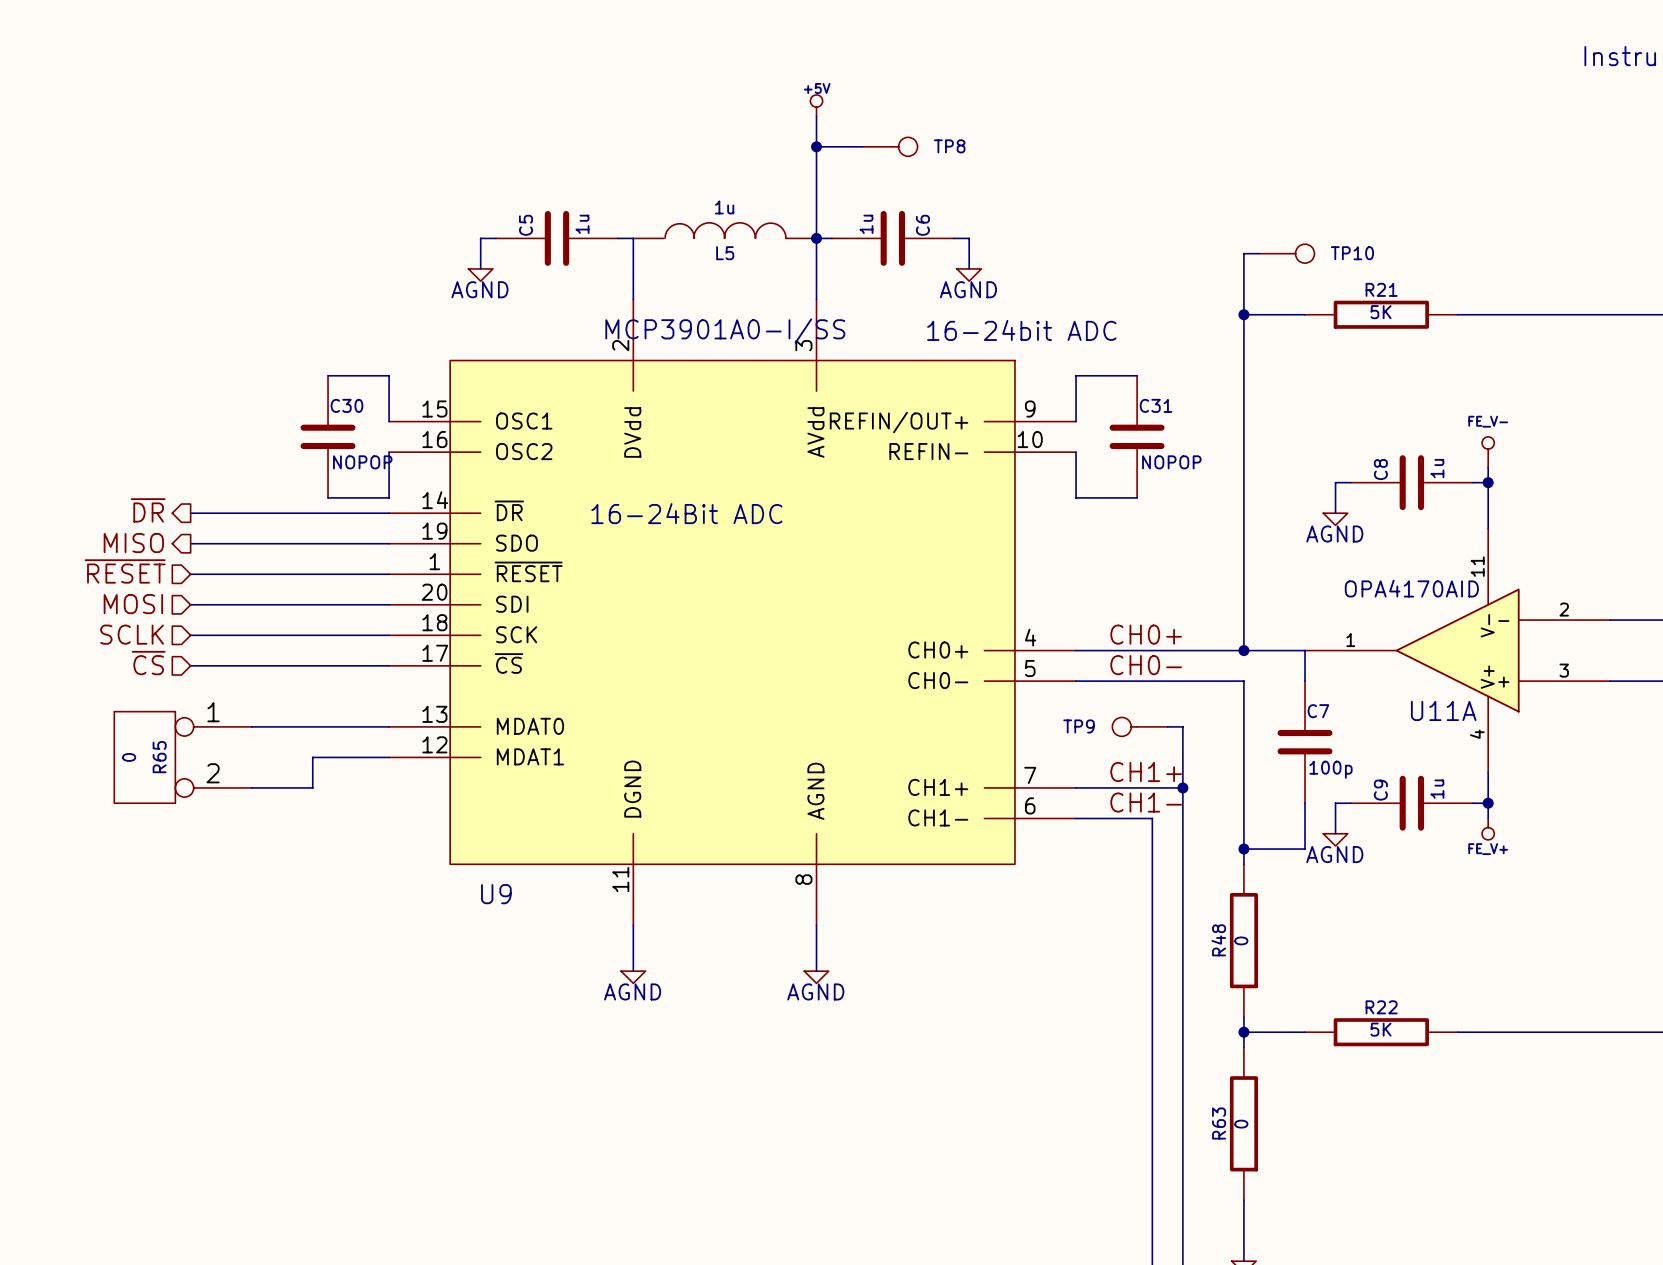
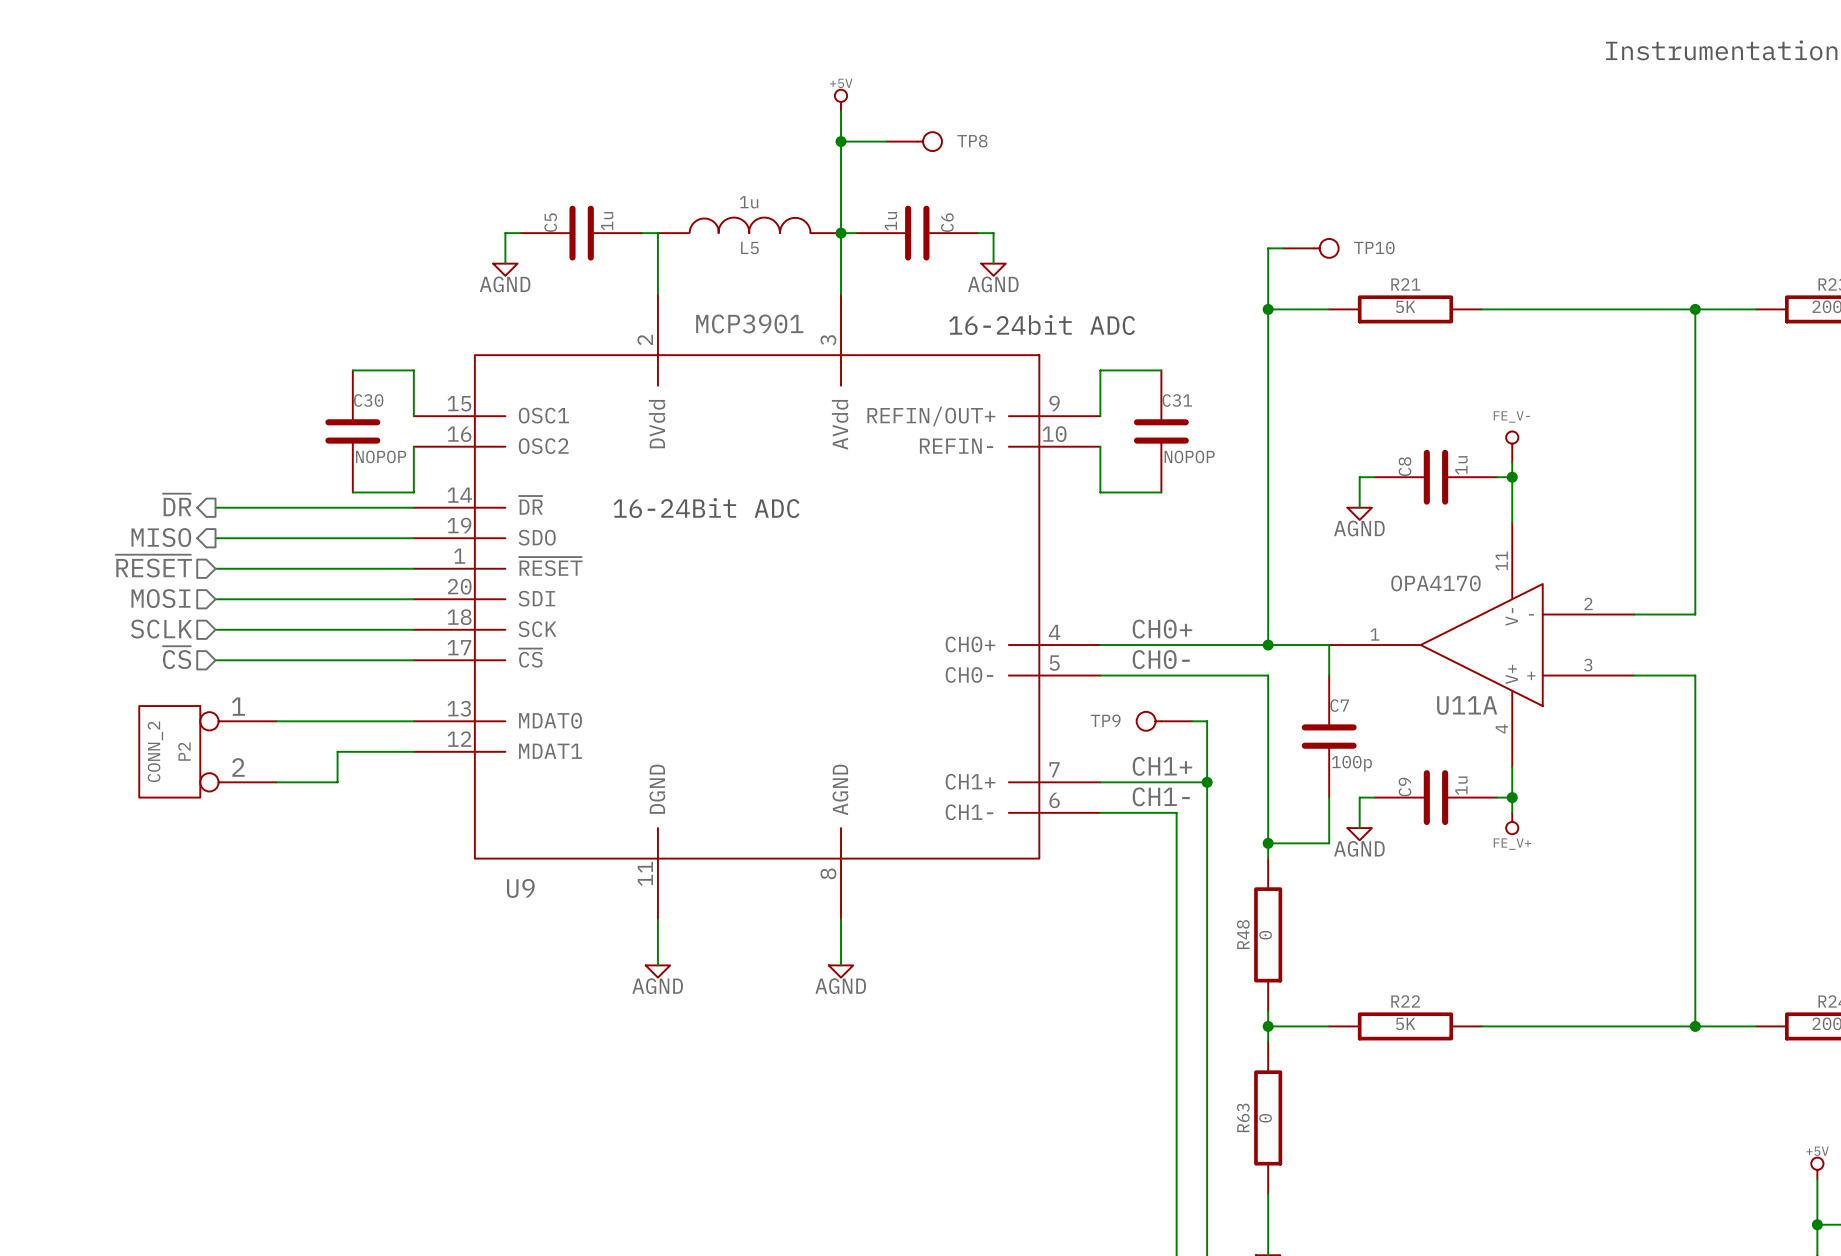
U9 value: MCP3901A0-I/SS (725, 331) -> MCP3901 (749, 323)
U11A value: OPA4170AID (1411, 588) -> OPA4170 (1435, 583)
R65 value: 0 (129, 757) -> CONN_2 (155, 751)
R65 name: R65 (159, 757) -> P2 (184, 751)

